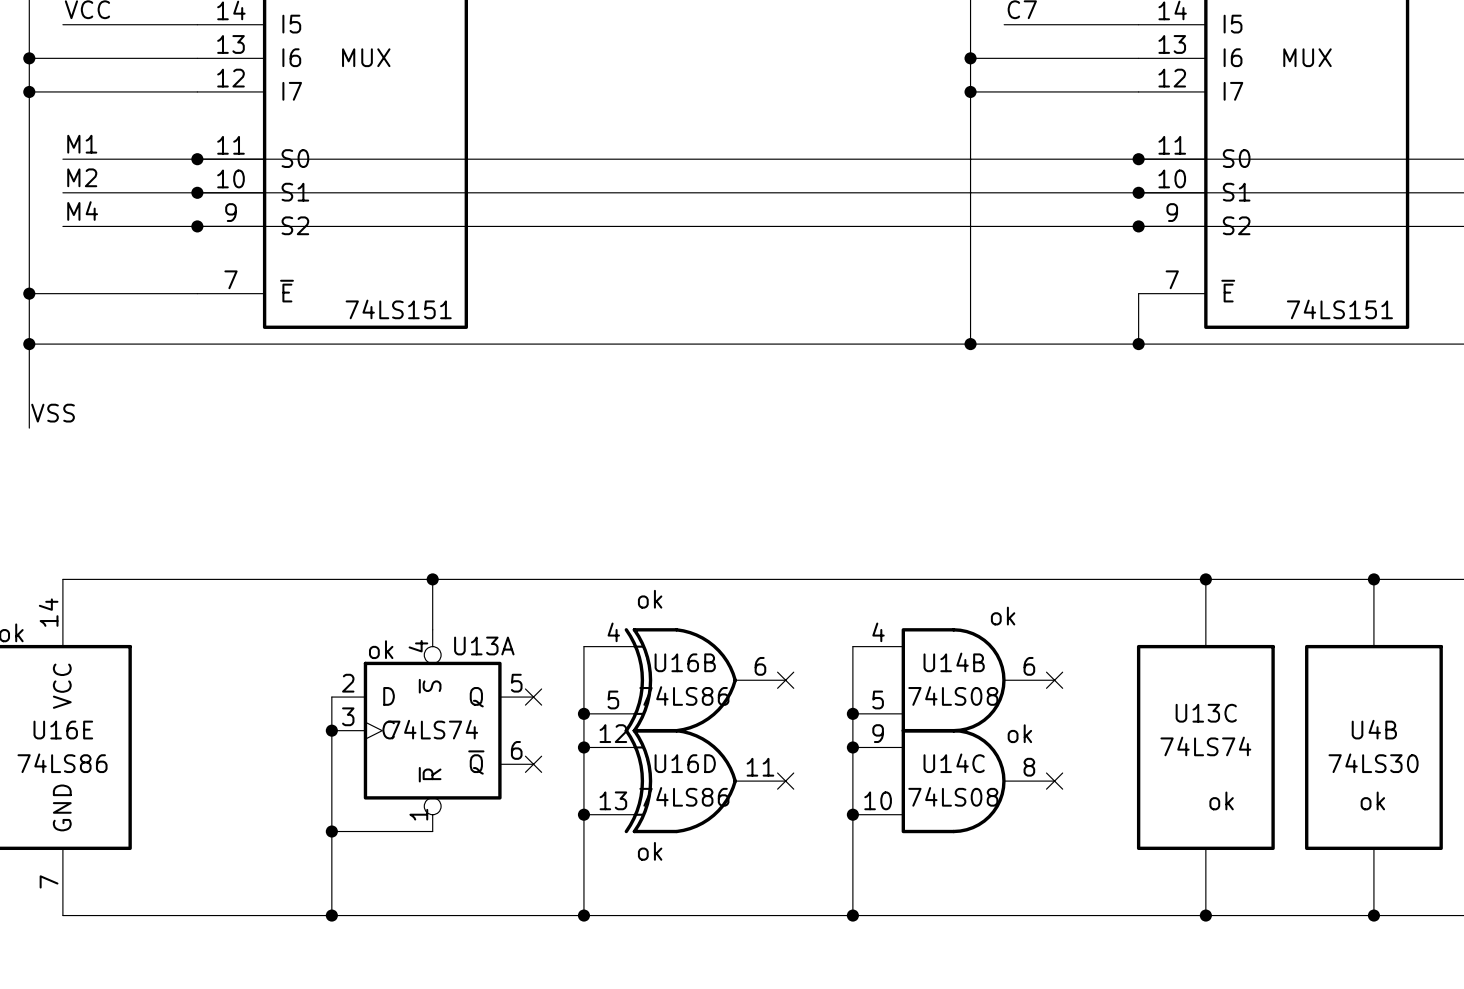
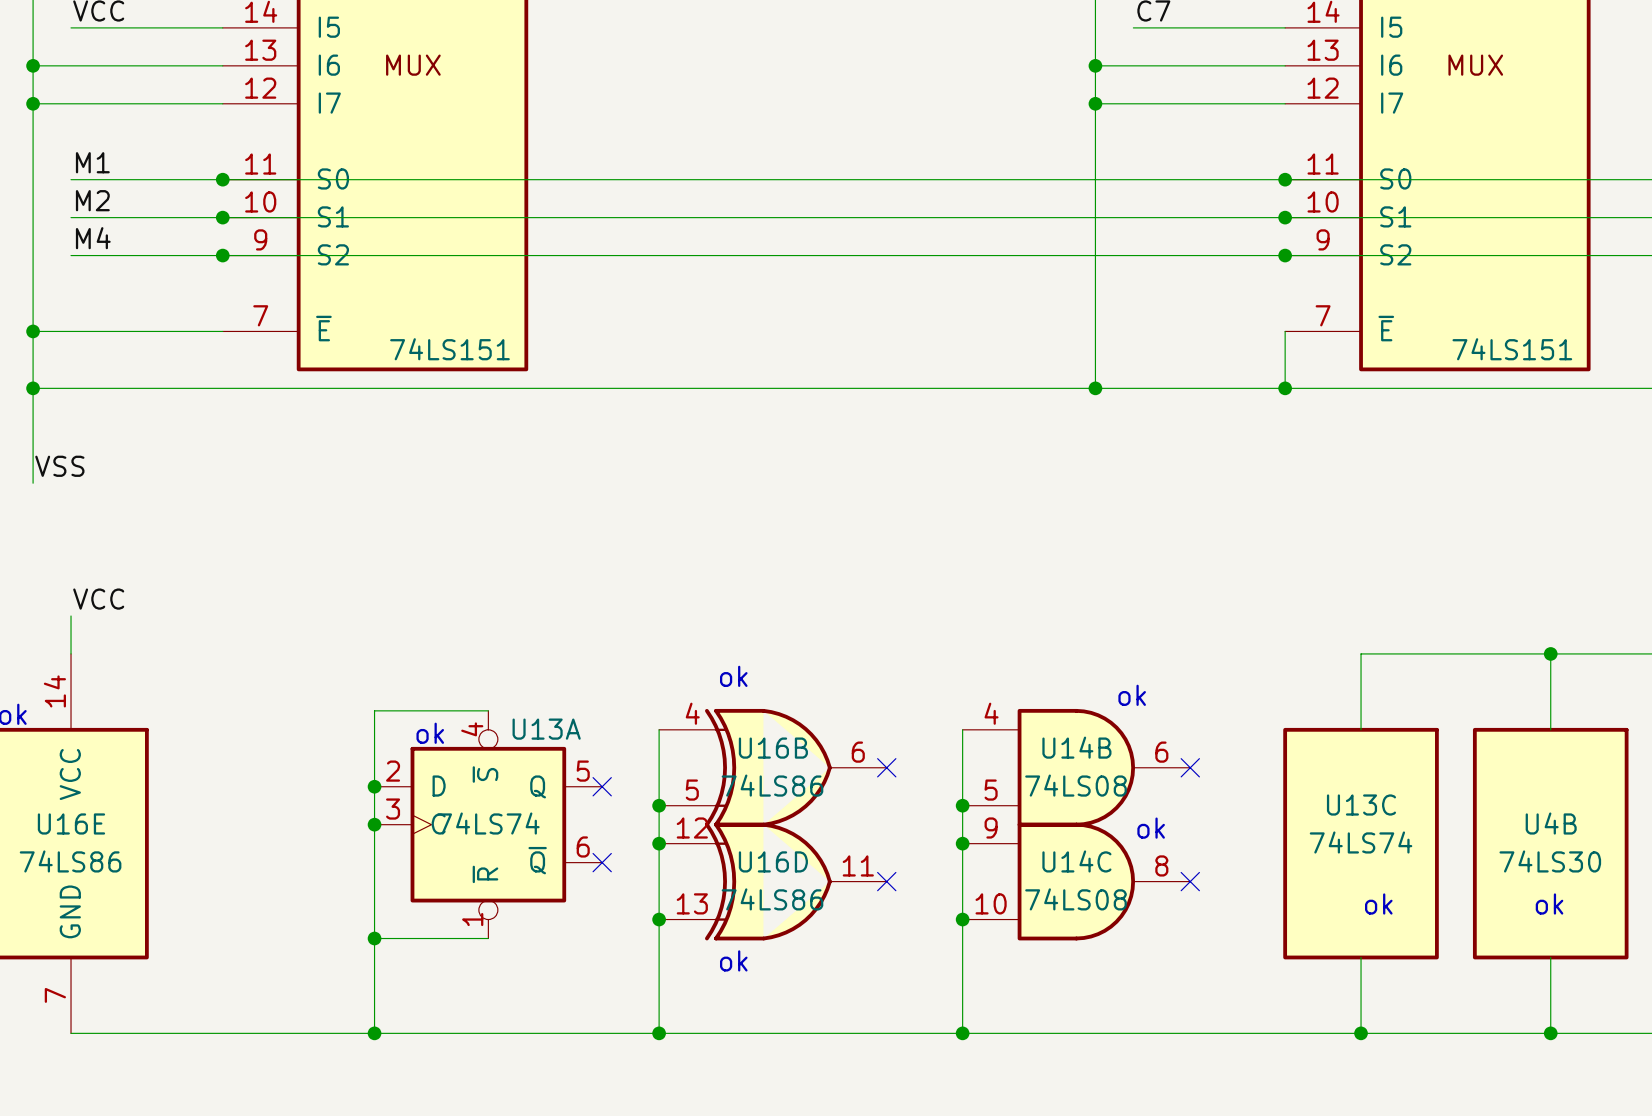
label: none -> VCC (98, 599)
wire: (62, 579) (1205, 579) -> (71, 653) (71, 616)
wire: (432, 579) (432, 629) -> (374, 786) (374, 710) (488, 710)
junction: (432, 579) -> none
junction: (1205, 579) -> none
junction: none -> (374, 786)

